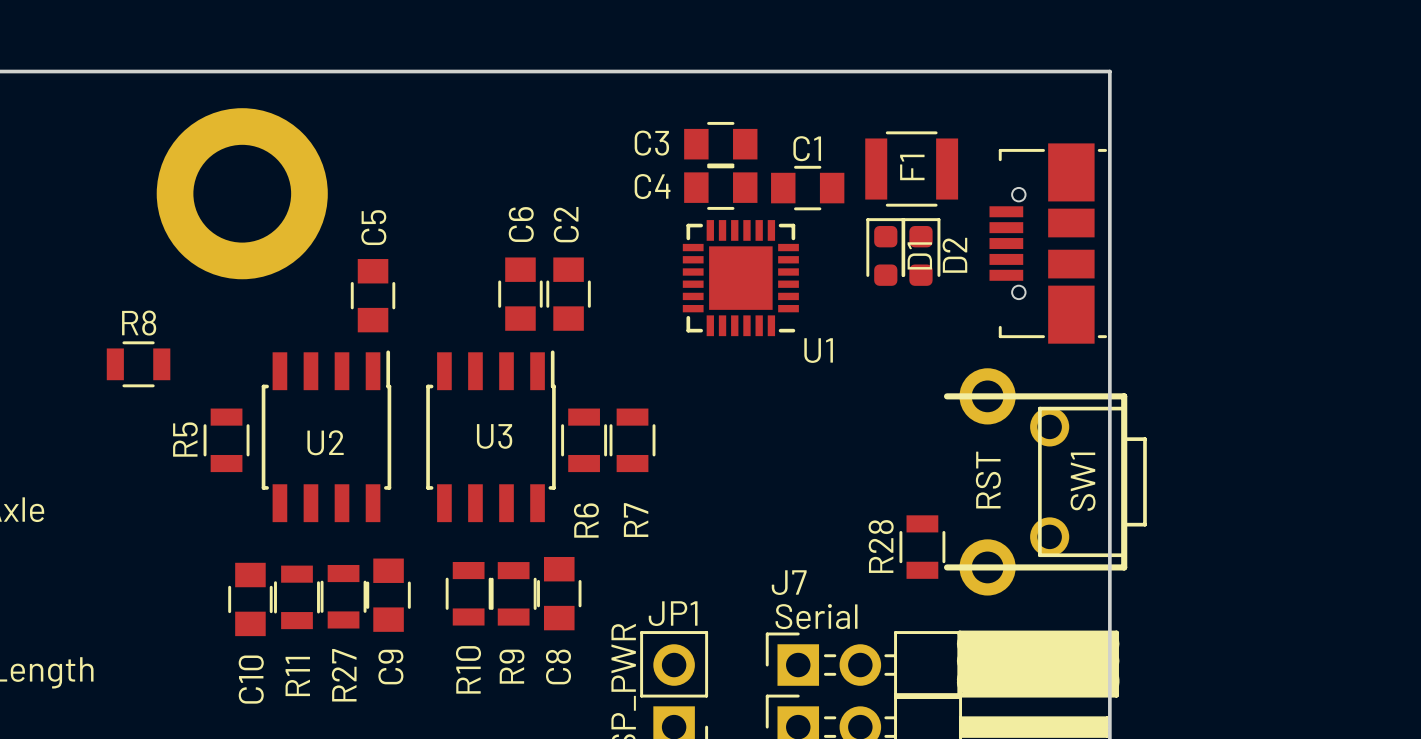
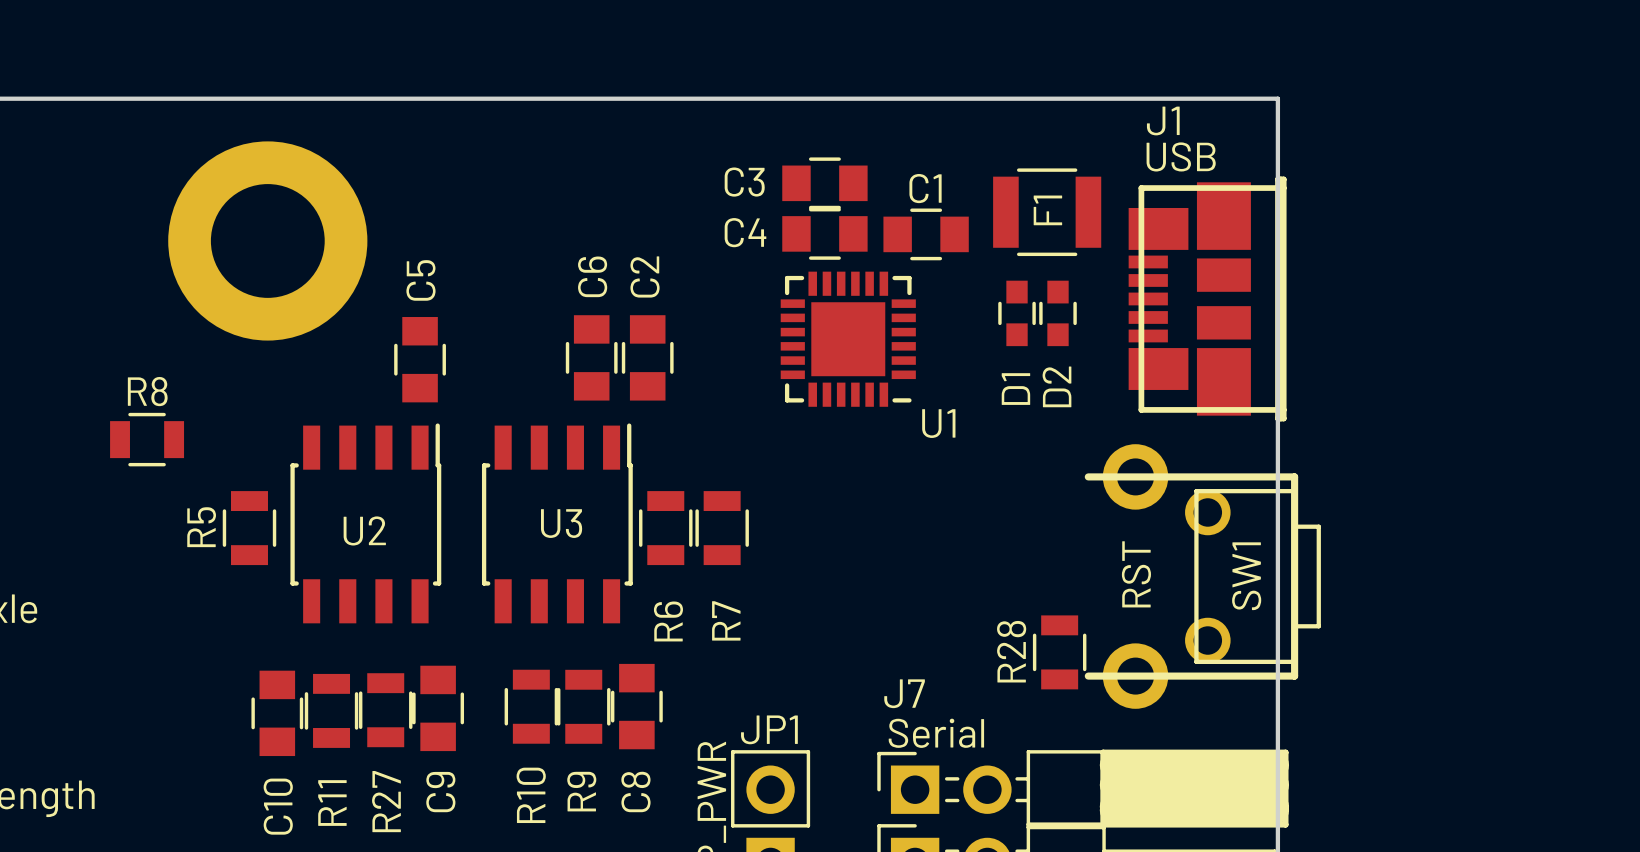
D1 footprint: [866, 218, 906, 286] -> [998, 280, 1036, 347]
D2 footprint: [901, 218, 941, 286] -> [1039, 280, 1077, 347]
part: (1048, 243) -> none
J1: none -> USB (1207, 298)
D1 name position: D1 (919, 255) -> D1 (1015, 389)
D2 name position: D2 (954, 255) -> D2 (1056, 386)

